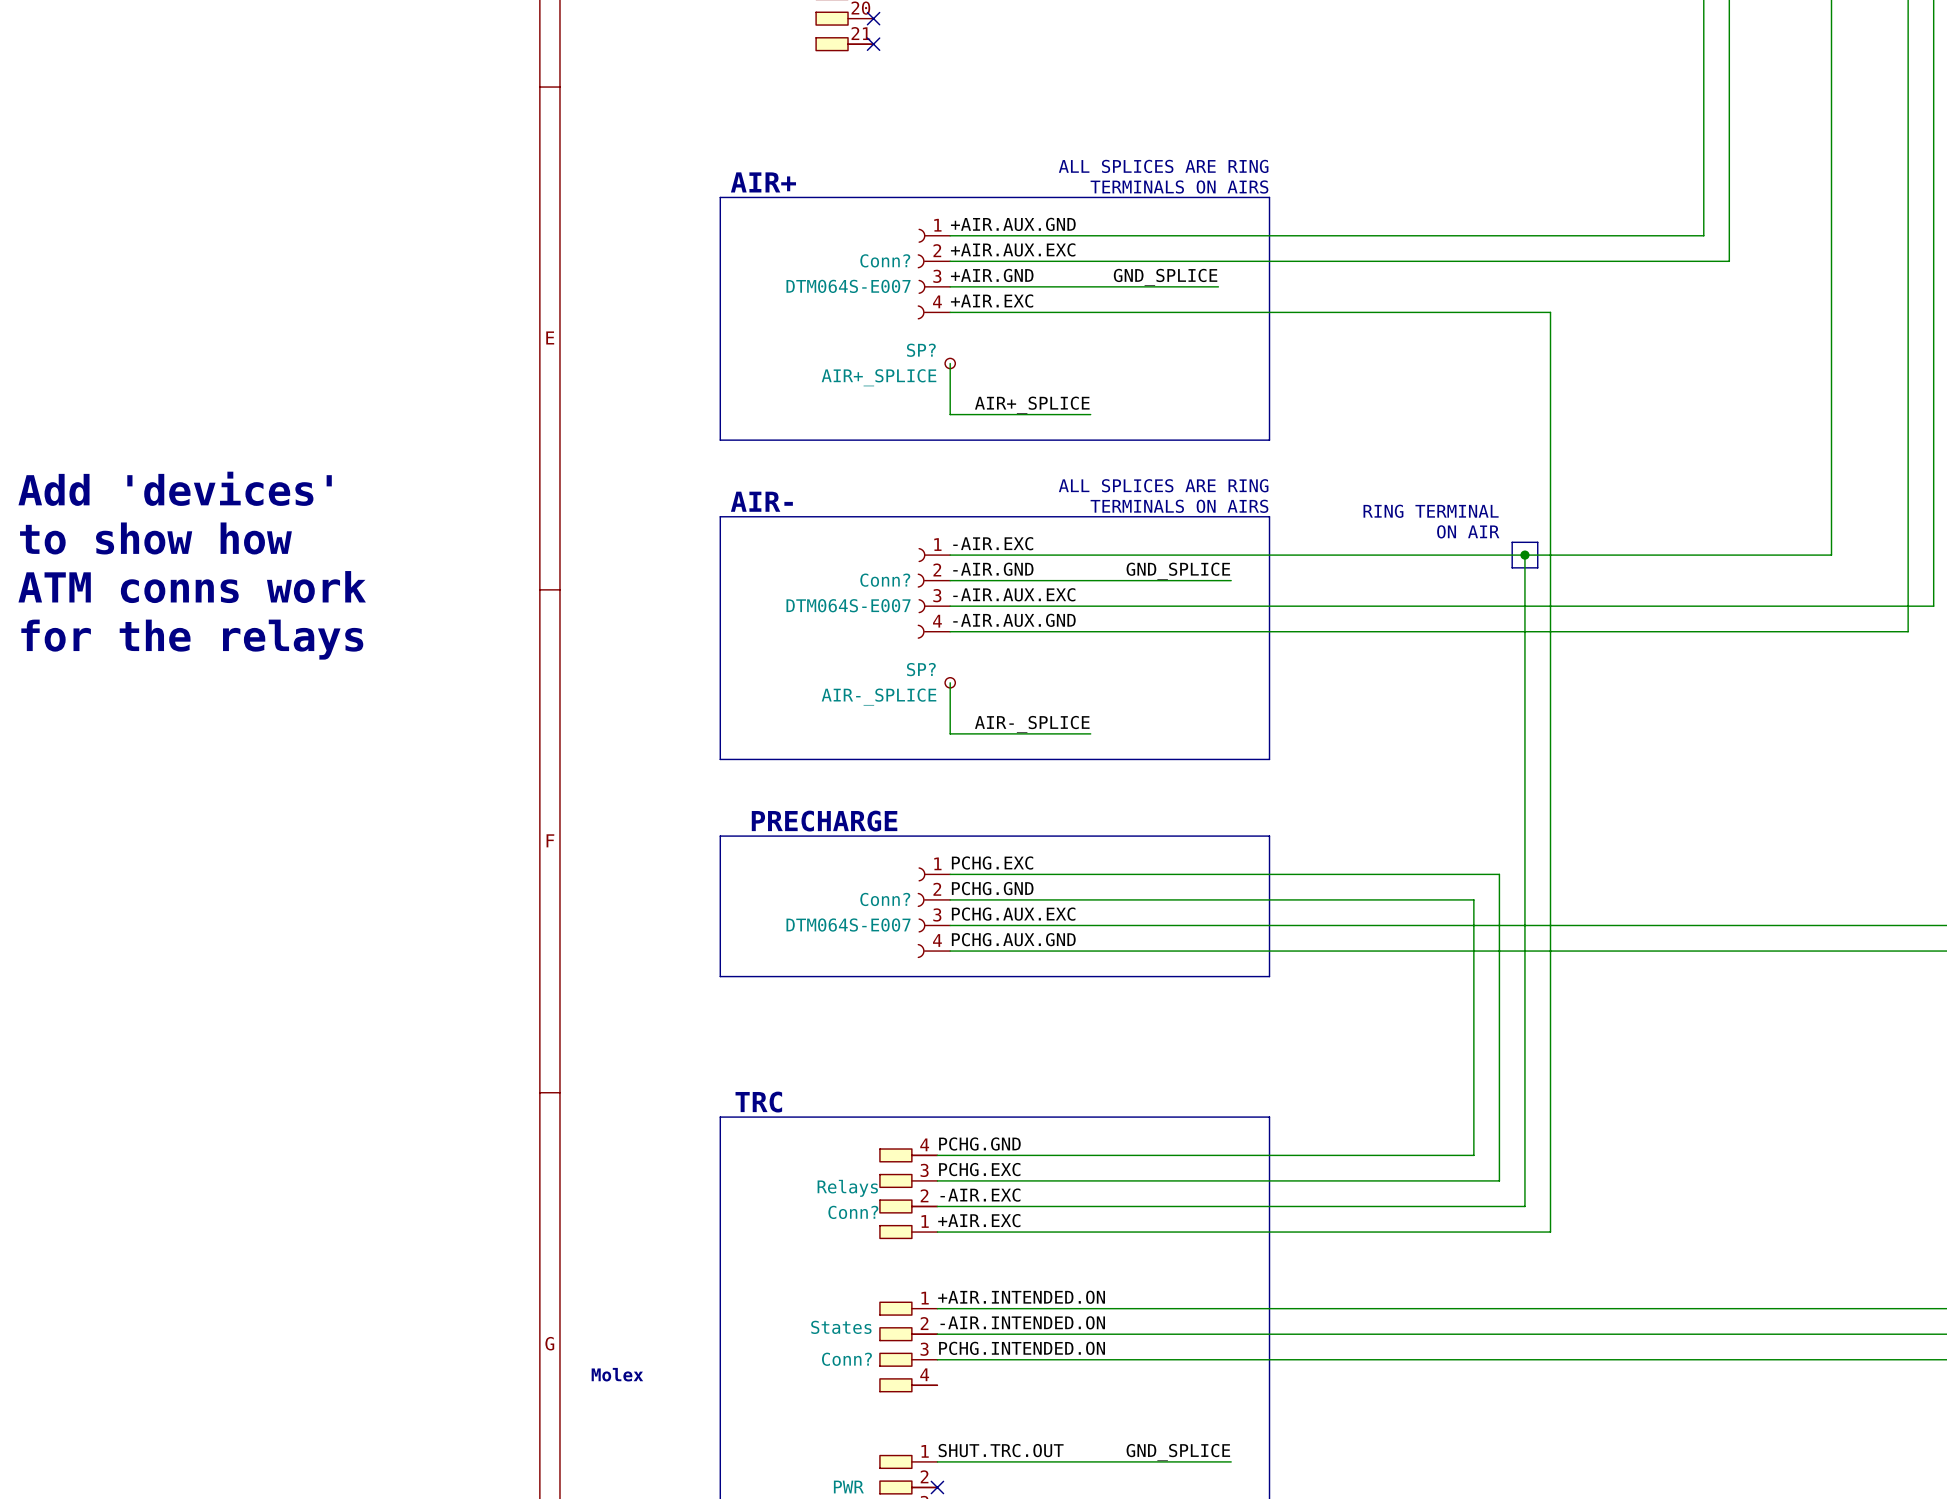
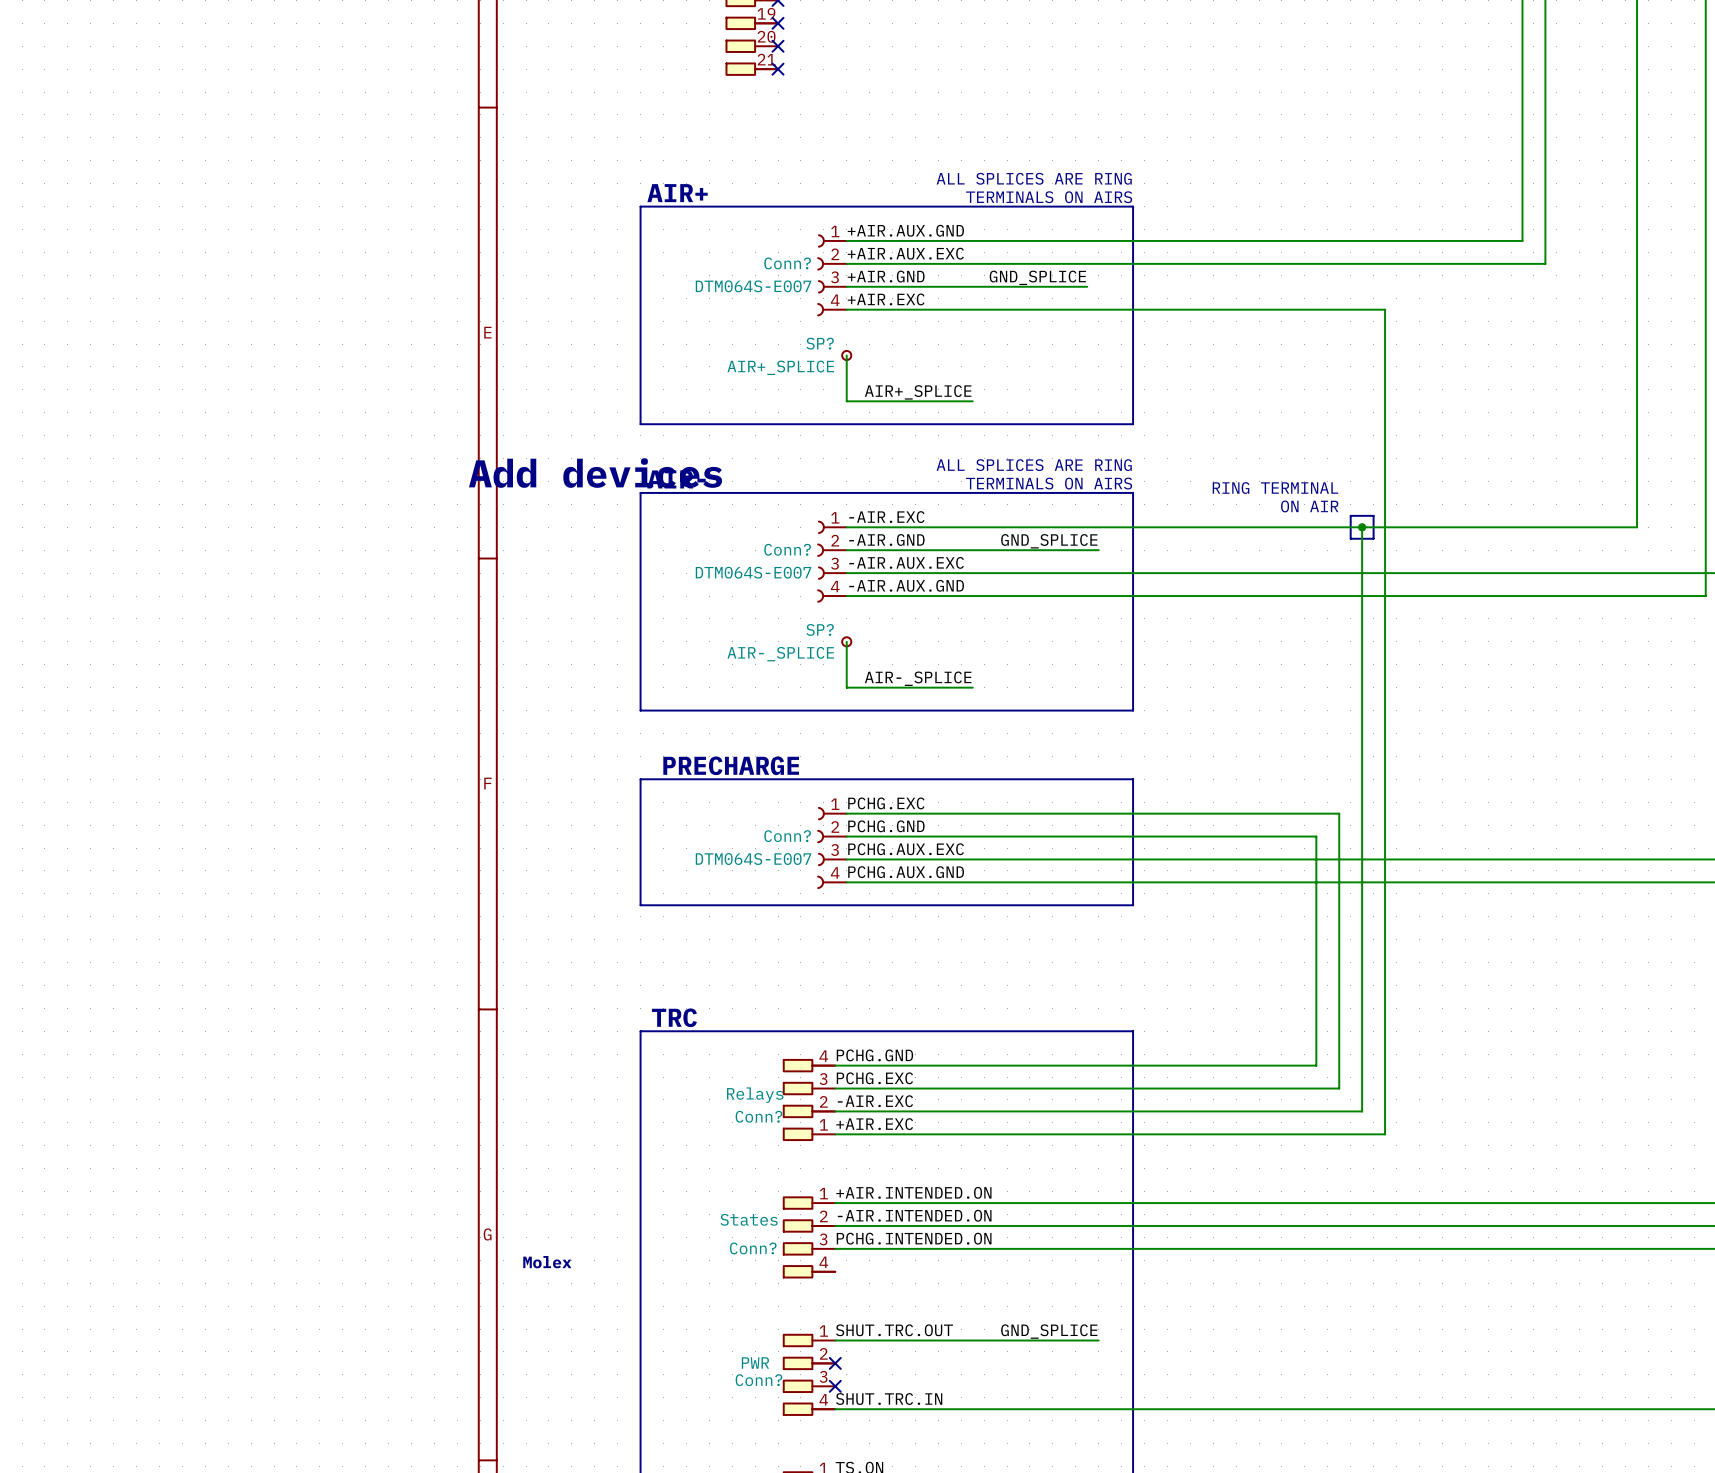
text: Add 'devices' (175, 488) -> none
text: none -> Add devices (595, 473)
text: to show how (155, 538) -> none
text: ATM conns work (192, 587) -> none
text: for the relays (192, 639) -> none

